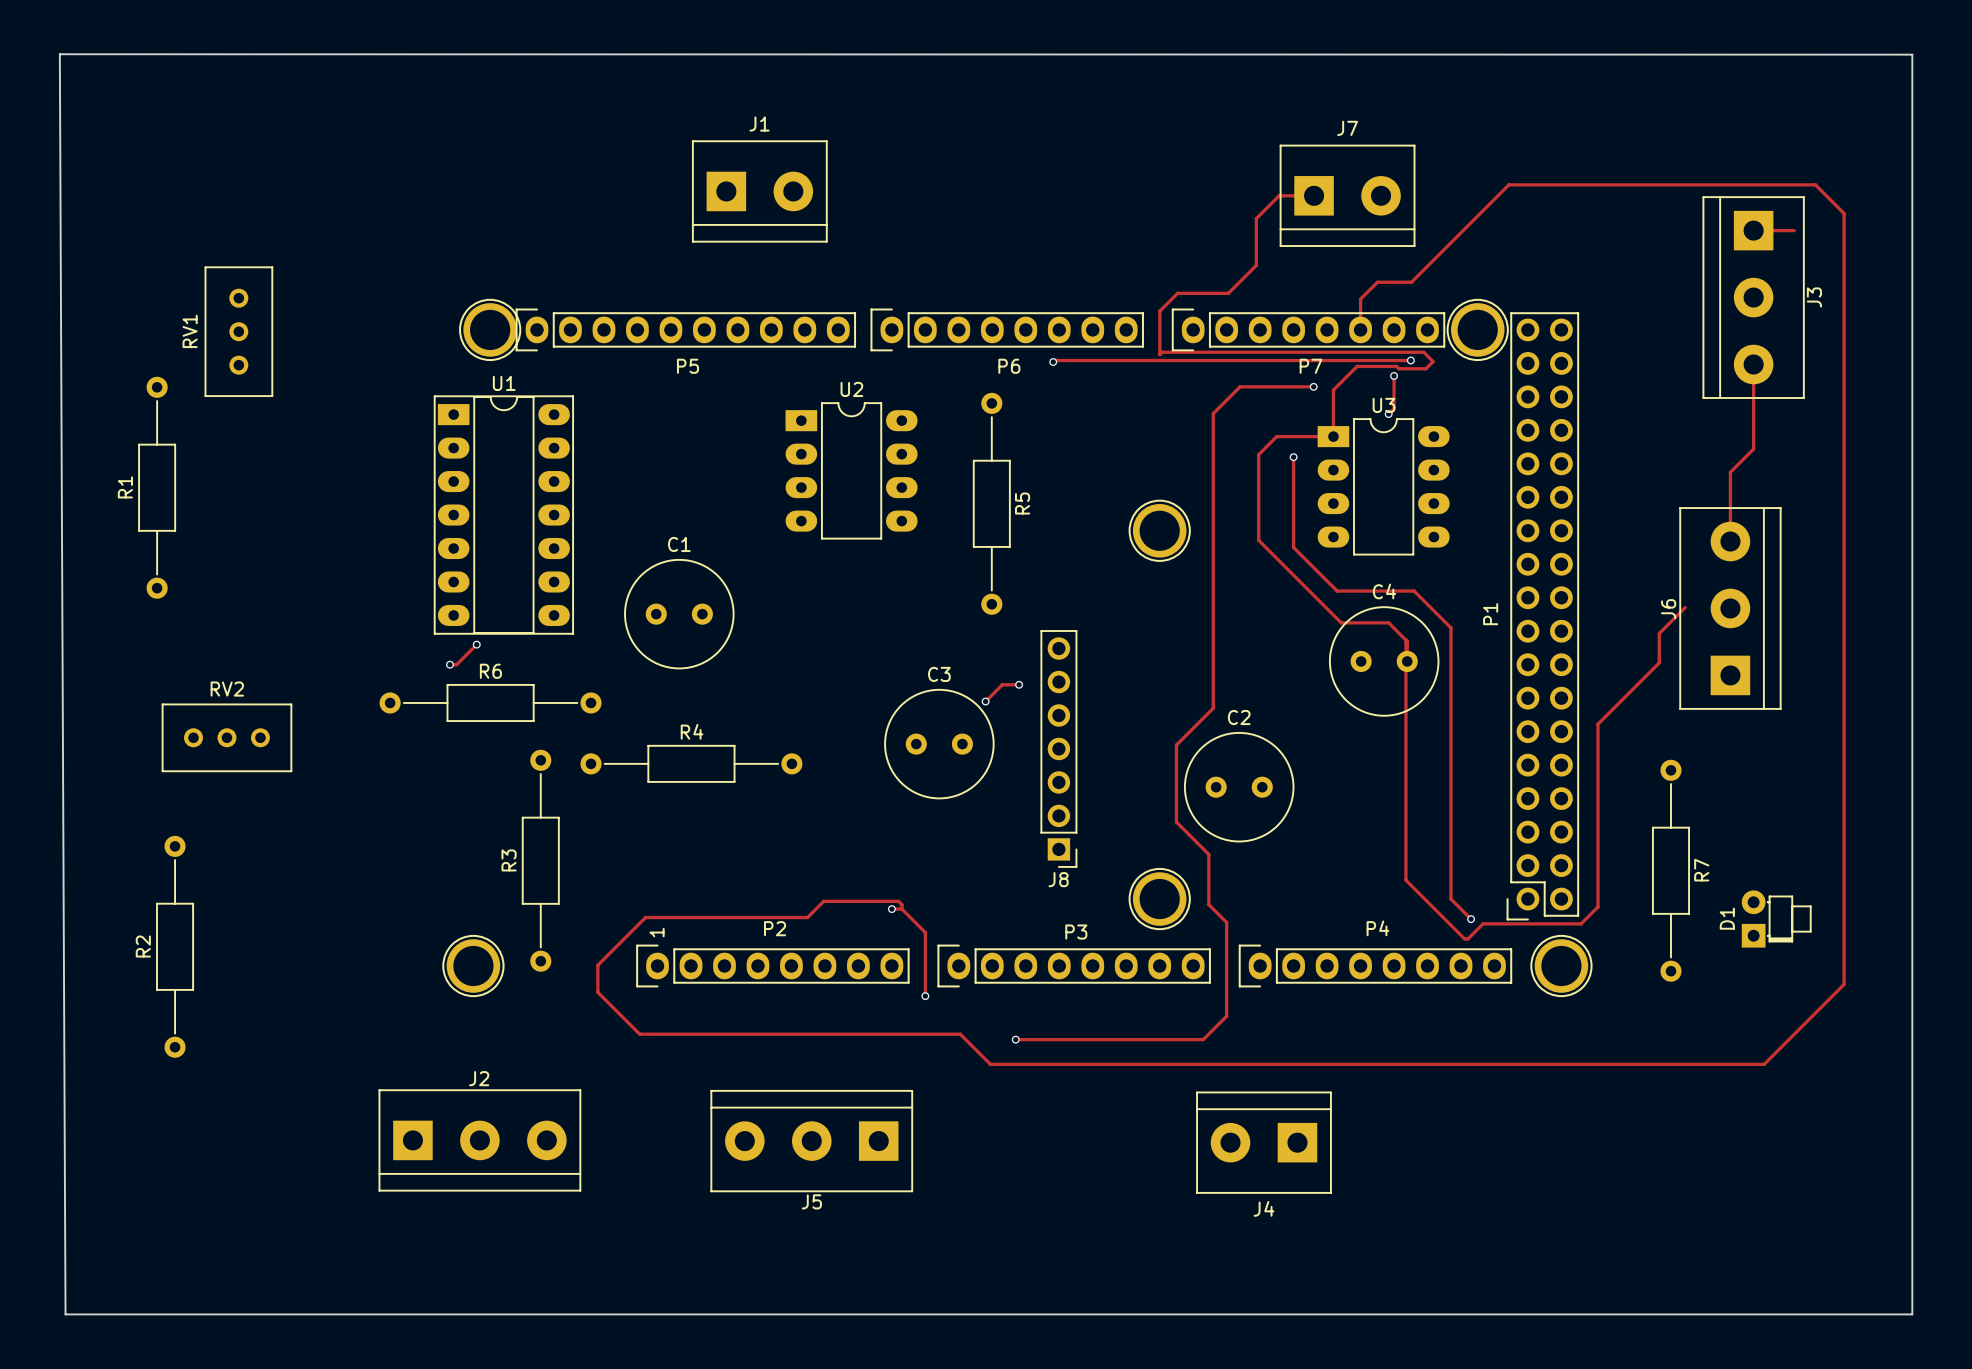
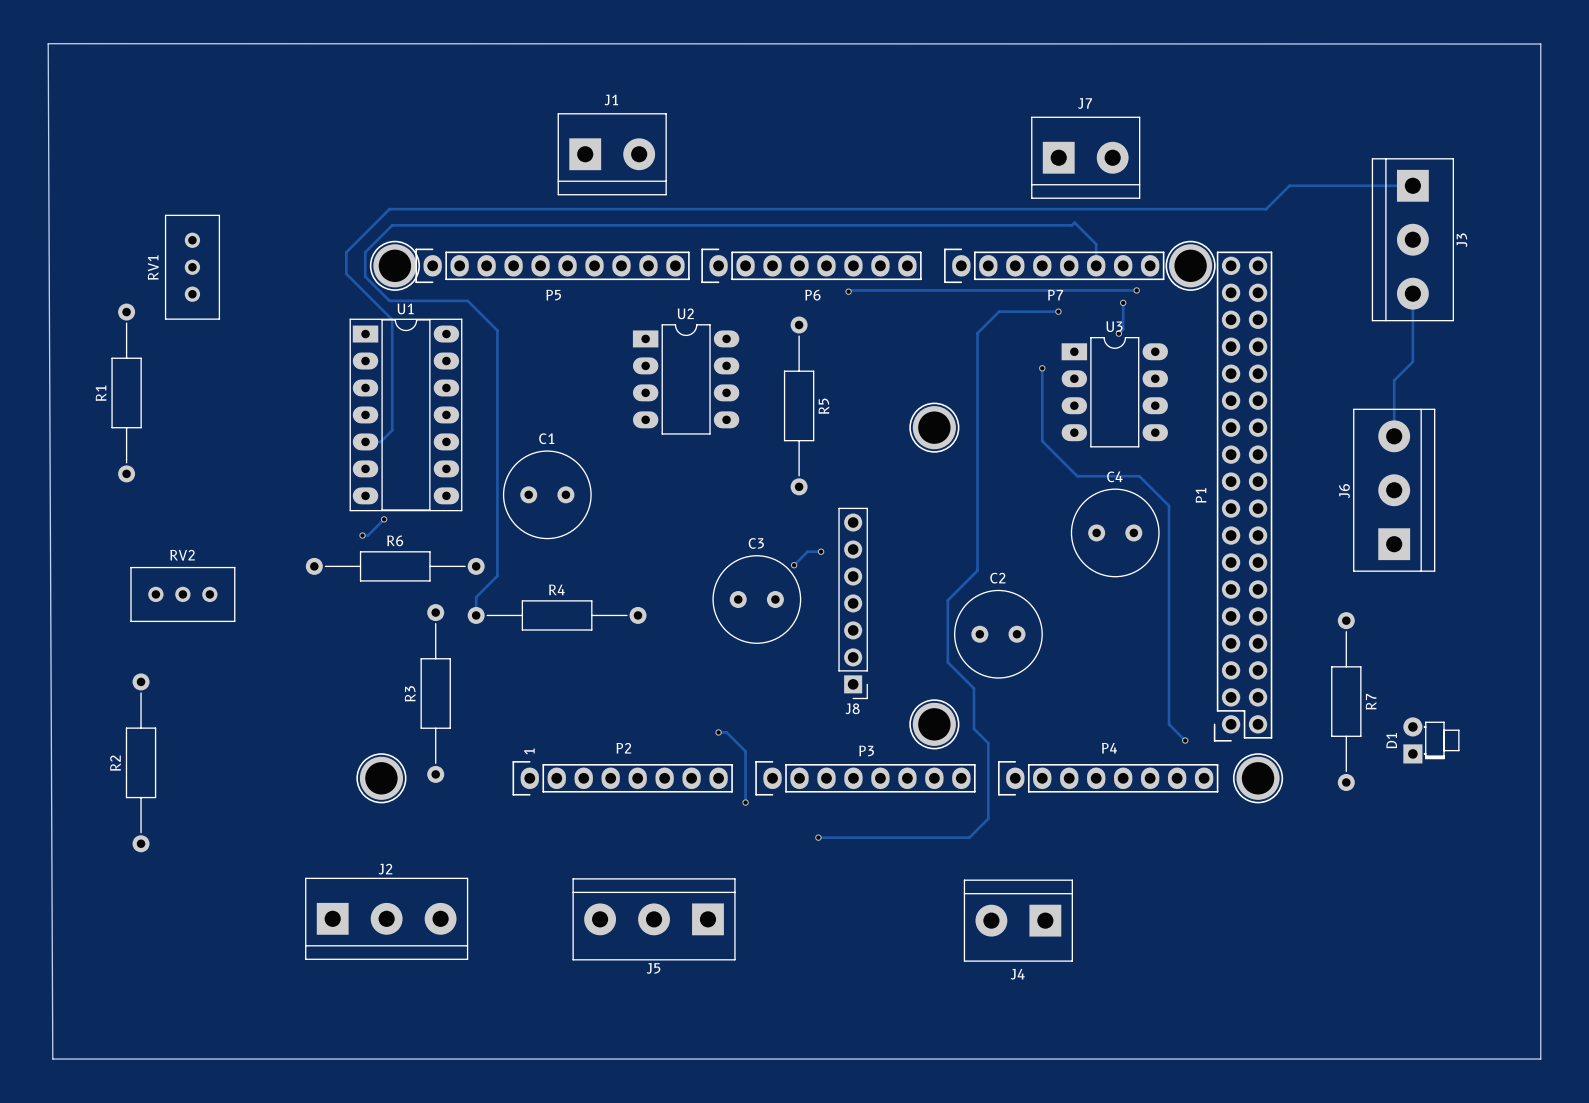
track: (1314, 195) (1279, 195) (1256, 218) (1256, 265) (1228, 293) (1177, 293) (1159, 311) (1159, 354) -> none
track: (1753, 230) (1794, 230) -> (1412, 185) (1289, 185) (1266, 209) (389, 209) (346, 252) (346, 273) (392, 319) (392, 430) (380, 441) (369, 441)
track: (1360, 303) (1360, 299) (1377, 282) (1411, 282) (1508, 184) (1815, 184) (1844, 213) (1844, 984) (1764, 1064) (990, 1064) (960, 1034) (639, 1034) (597, 992) (597, 965) (645, 917) (807, 917) (823, 901) (898, 901) (901, 904) (901, 909) -> (1096, 244) (1074, 222) (1071, 225) (392, 225) (365, 252) (365, 276) (389, 300) (467, 300) (497, 330) (497, 576) (476, 597) (476, 615)
track: (1159, 354) (1162, 352) (1423, 352) (1433, 361) (1425, 368) (1357, 366) (1333, 390) (1333, 436) (1276, 436) (1258, 454) (1258, 540) (1341, 622) (1388, 622) (1407, 641) (1407, 661) -> none
track: (1685, 607) (1659, 633) (1659, 662) (1597, 724) (1597, 907) (1581, 923) (1483, 923) (1468, 938) (1464, 938) (1405, 880) (1405, 640) -> none

